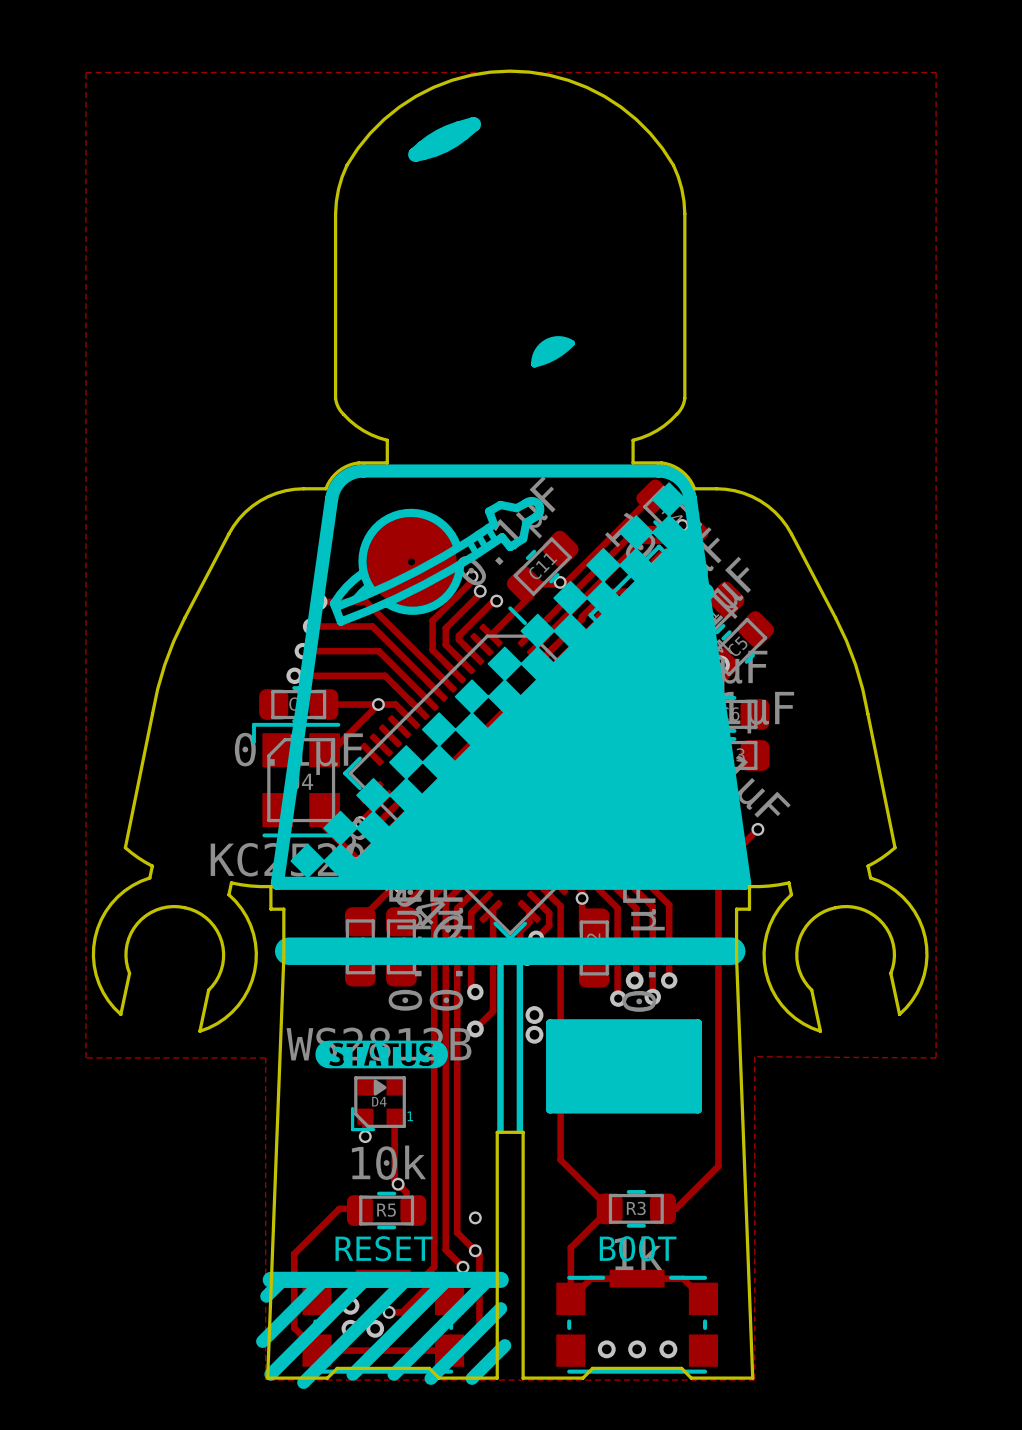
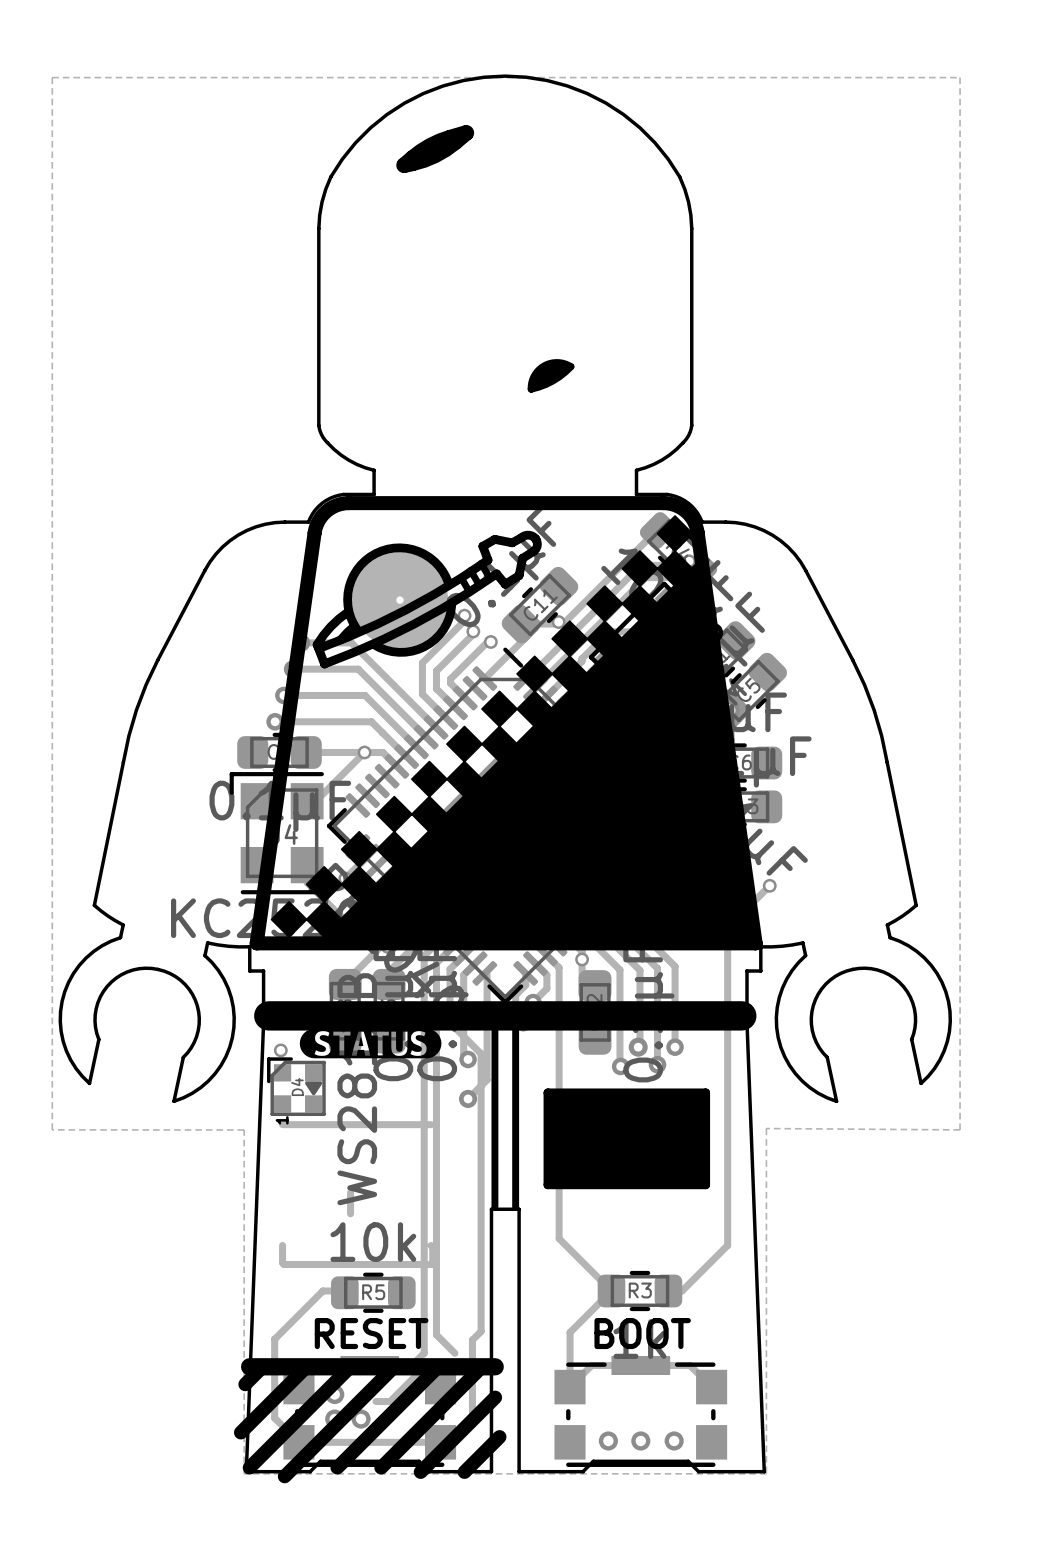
track: (458, 907) (457, 1232) (479, 1254) -> (450, 969) (450, 1022) (481, 1053) (481, 1331) (472, 1340)
via: none -> (280, 1050)
via: (534, 1015) -> none
via: (534, 1034) -> none
track: none -> (282, 1124) (431, 1124)
drawing position: (381, 1054) -> (370, 1043)
D4 rotation: 0° (378, 1103) -> 90° clockwise (296, 1086)
D4 position: (378, 1103) -> (296, 1086)
track: (394, 1116) (394, 1180) (406, 1192) (406, 1208) -> none
via: (365, 1136) -> none
track: none -> (282, 1245) (282, 1262) (284, 1264) (432, 1264) (432, 1247) (431, 1245)
via: (398, 1184) -> none
via: (475, 1217) -> none
via: (475, 1250) -> none
via: (463, 1267) -> none
via: (389, 1312) -> none

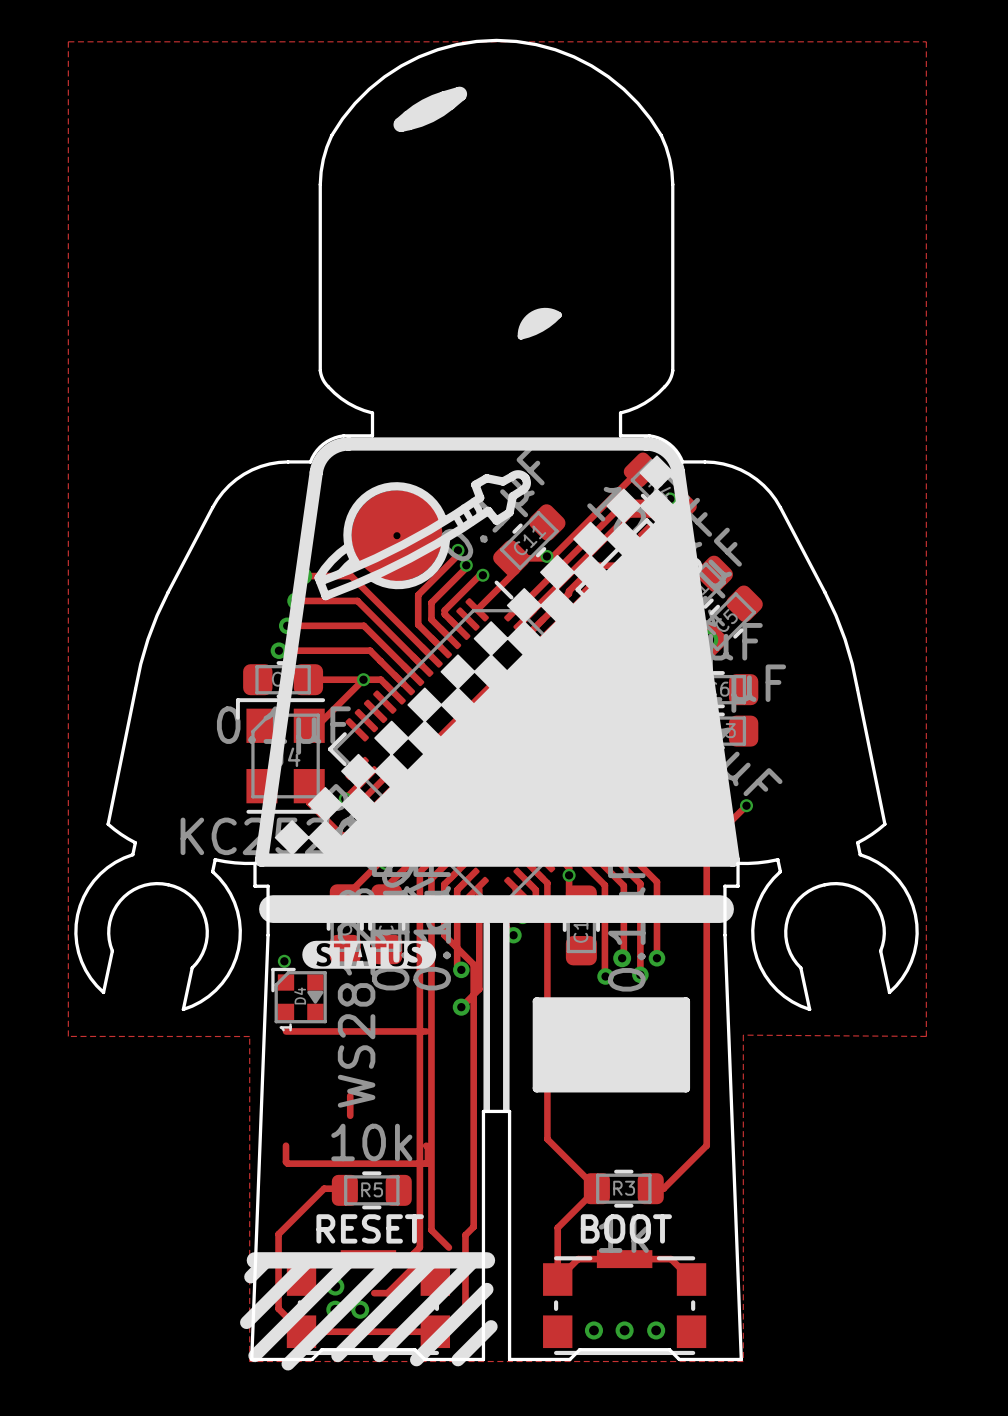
line: (268, 1015) (741, 1015) -> (272, 909) (720, 909)

